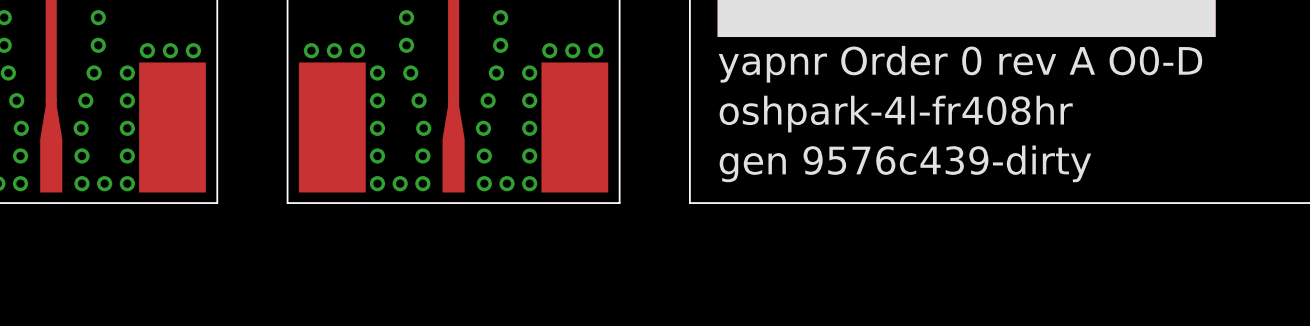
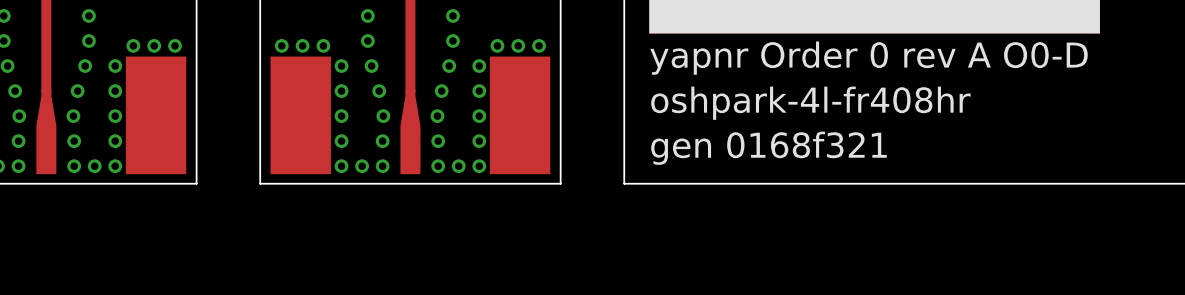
text: gen 9576c439-dirty (905, 163) -> gen 0168f321 (768, 148)

